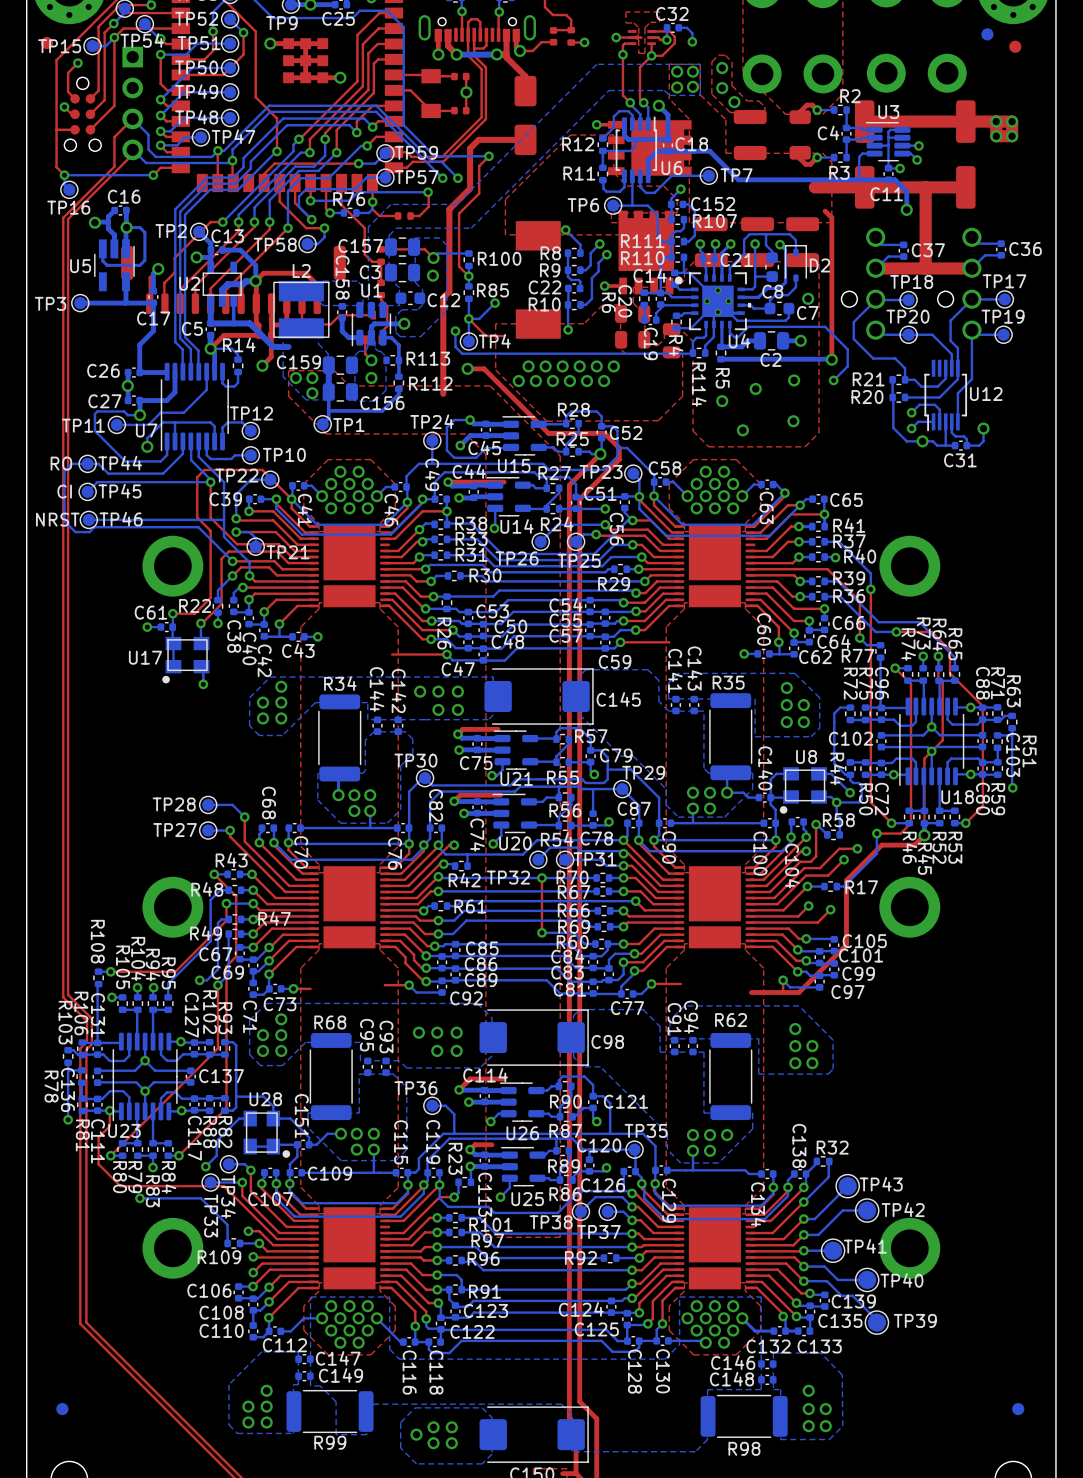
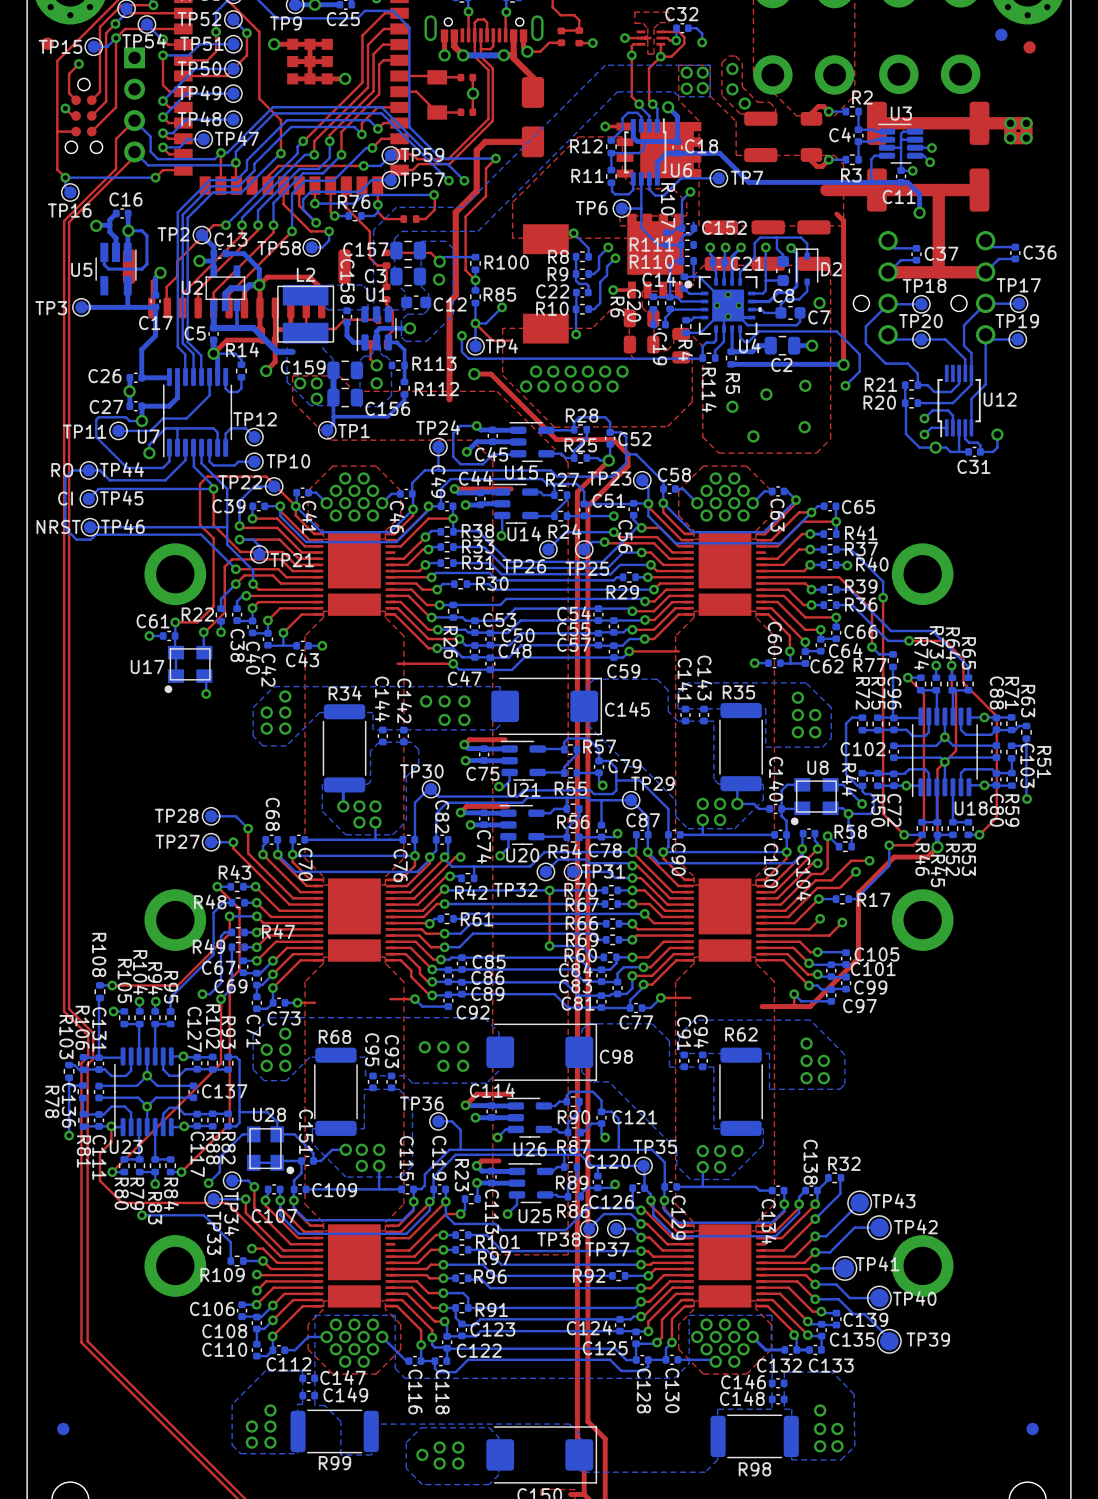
bottom track: (672, 197) (671, 219) -> (682, 200) (682, 228) (676, 228) (672, 232) (666, 232)
C152 position: (677, 204) -> (687, 228)
bottom track: (683, 204) (688, 204) (694, 211) (694, 235) (688, 241) (683, 241) -> none
bottom track: (632, 205) (647, 205) (657, 215) (657, 236) (662, 241) -> (641, 208) (641, 228) (658, 245) (666, 245)
R107 rotation: 0° (677, 219) -> 90° clockwise (666, 238)
R107 position: (677, 219) -> (666, 238)
R107 name position: R107 (714, 221) -> R107 (668, 205)

